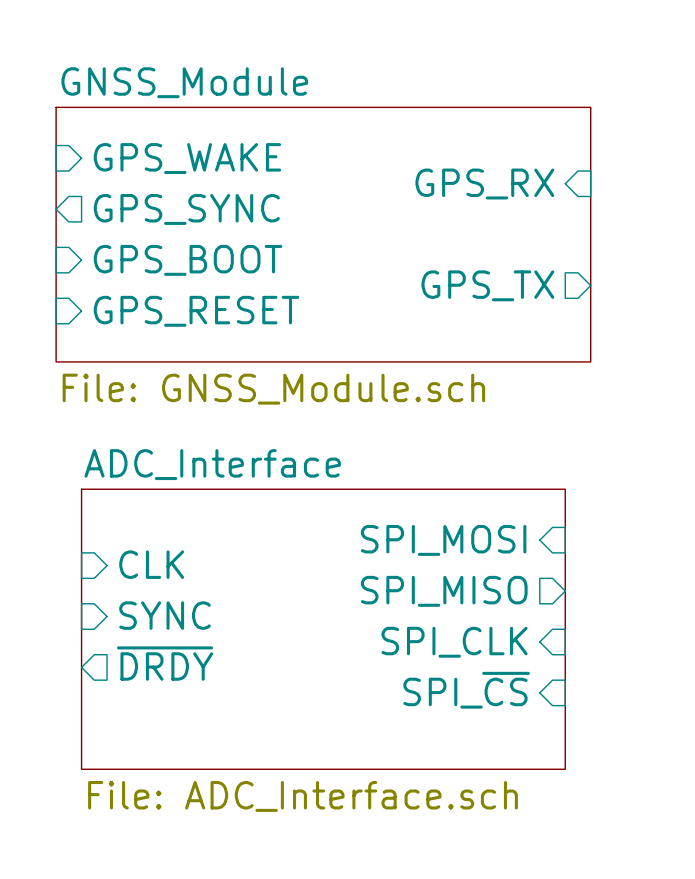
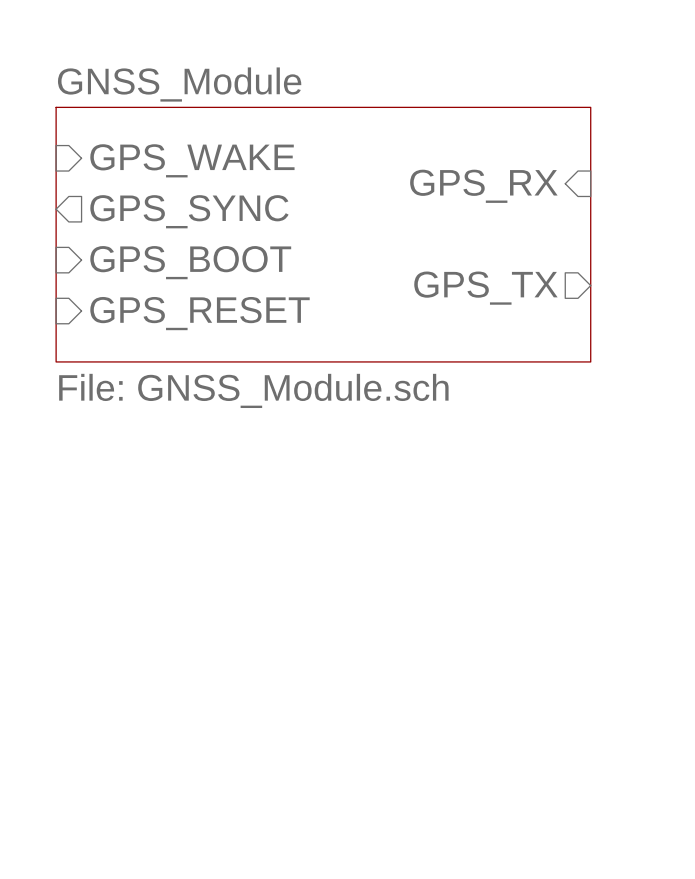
sheet pin: SPI_MOSI (443, 540) -> none
sheet pin: CLK (151, 564) -> none
sheet pin: SPI_MISO (444, 591) -> none
sheet pin: SYNC (165, 615) -> none
sheet ADC_Interface: File: ADC_Interface.sch (323, 629) -> none
sheet pin: SPI_CLK (454, 642) -> none
sheet pin: ~{DRDY} (165, 663) -> none
sheet pin: SPI_~{CS} (466, 690) -> none

